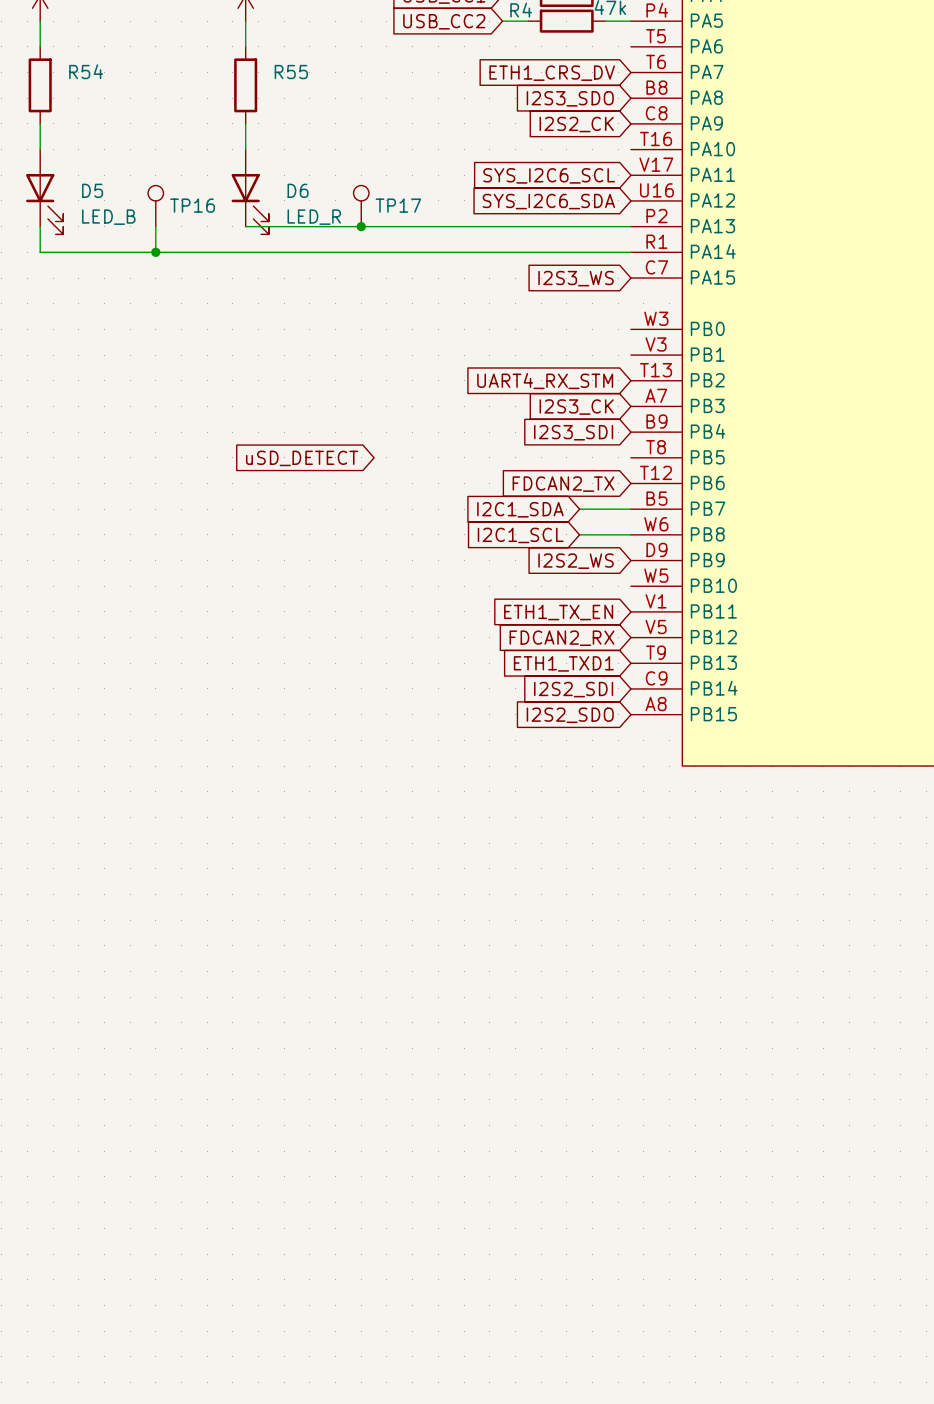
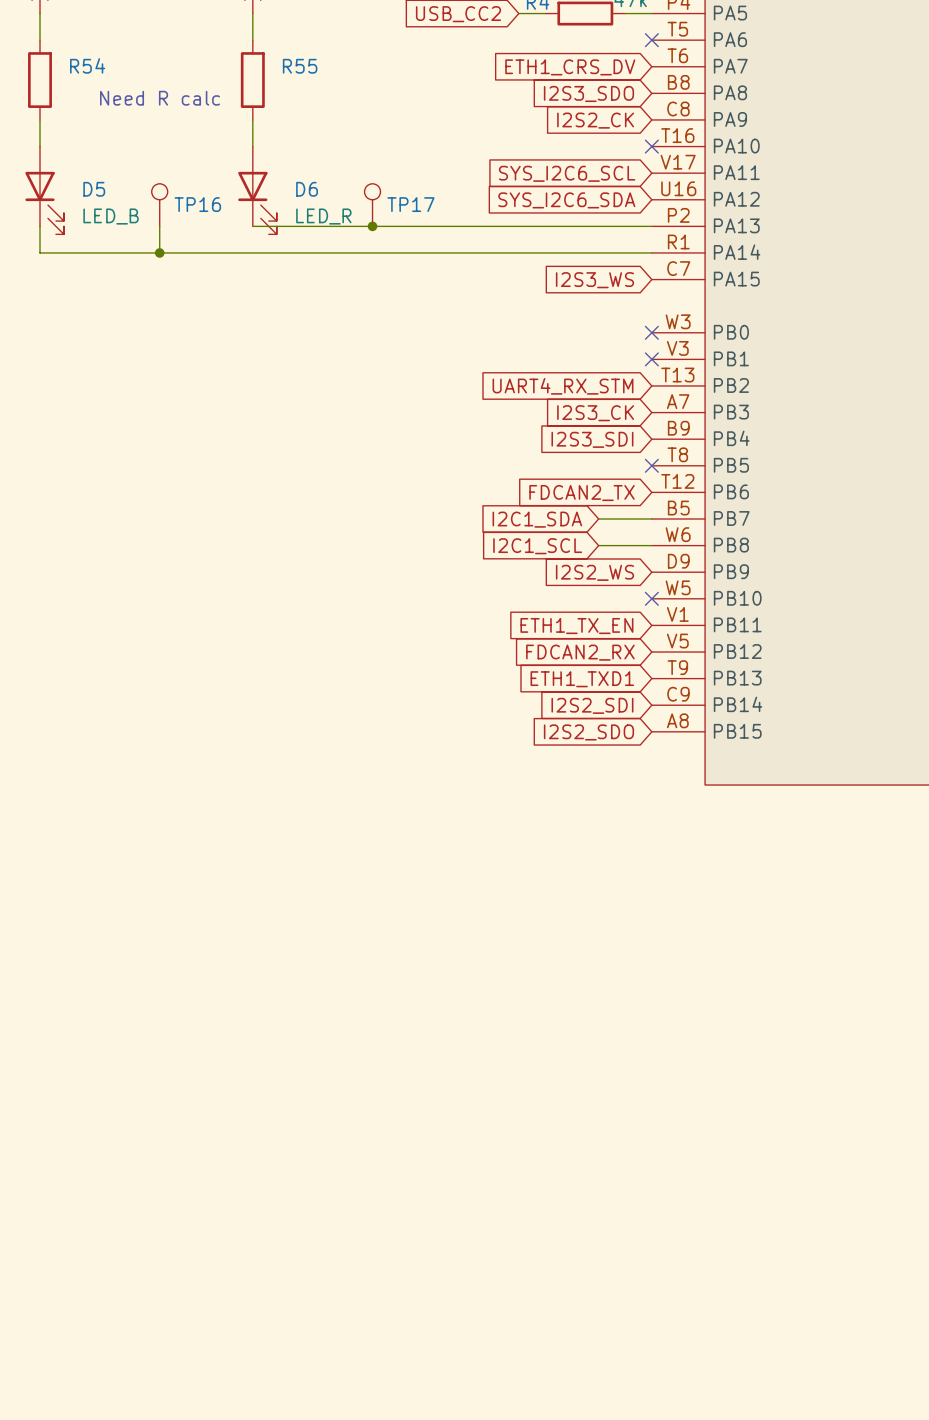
no-connect mark: none -> (651, 40)
text: none -> Need R calc (160, 98)
no-connect mark: none -> (651, 146)
no-connect mark: none -> (651, 332)
no-connect mark: none -> (651, 359)
no-connect mark: none -> (651, 465)
global label: uSD_DETECT (302, 458) -> none
no-connect mark: none -> (651, 598)

